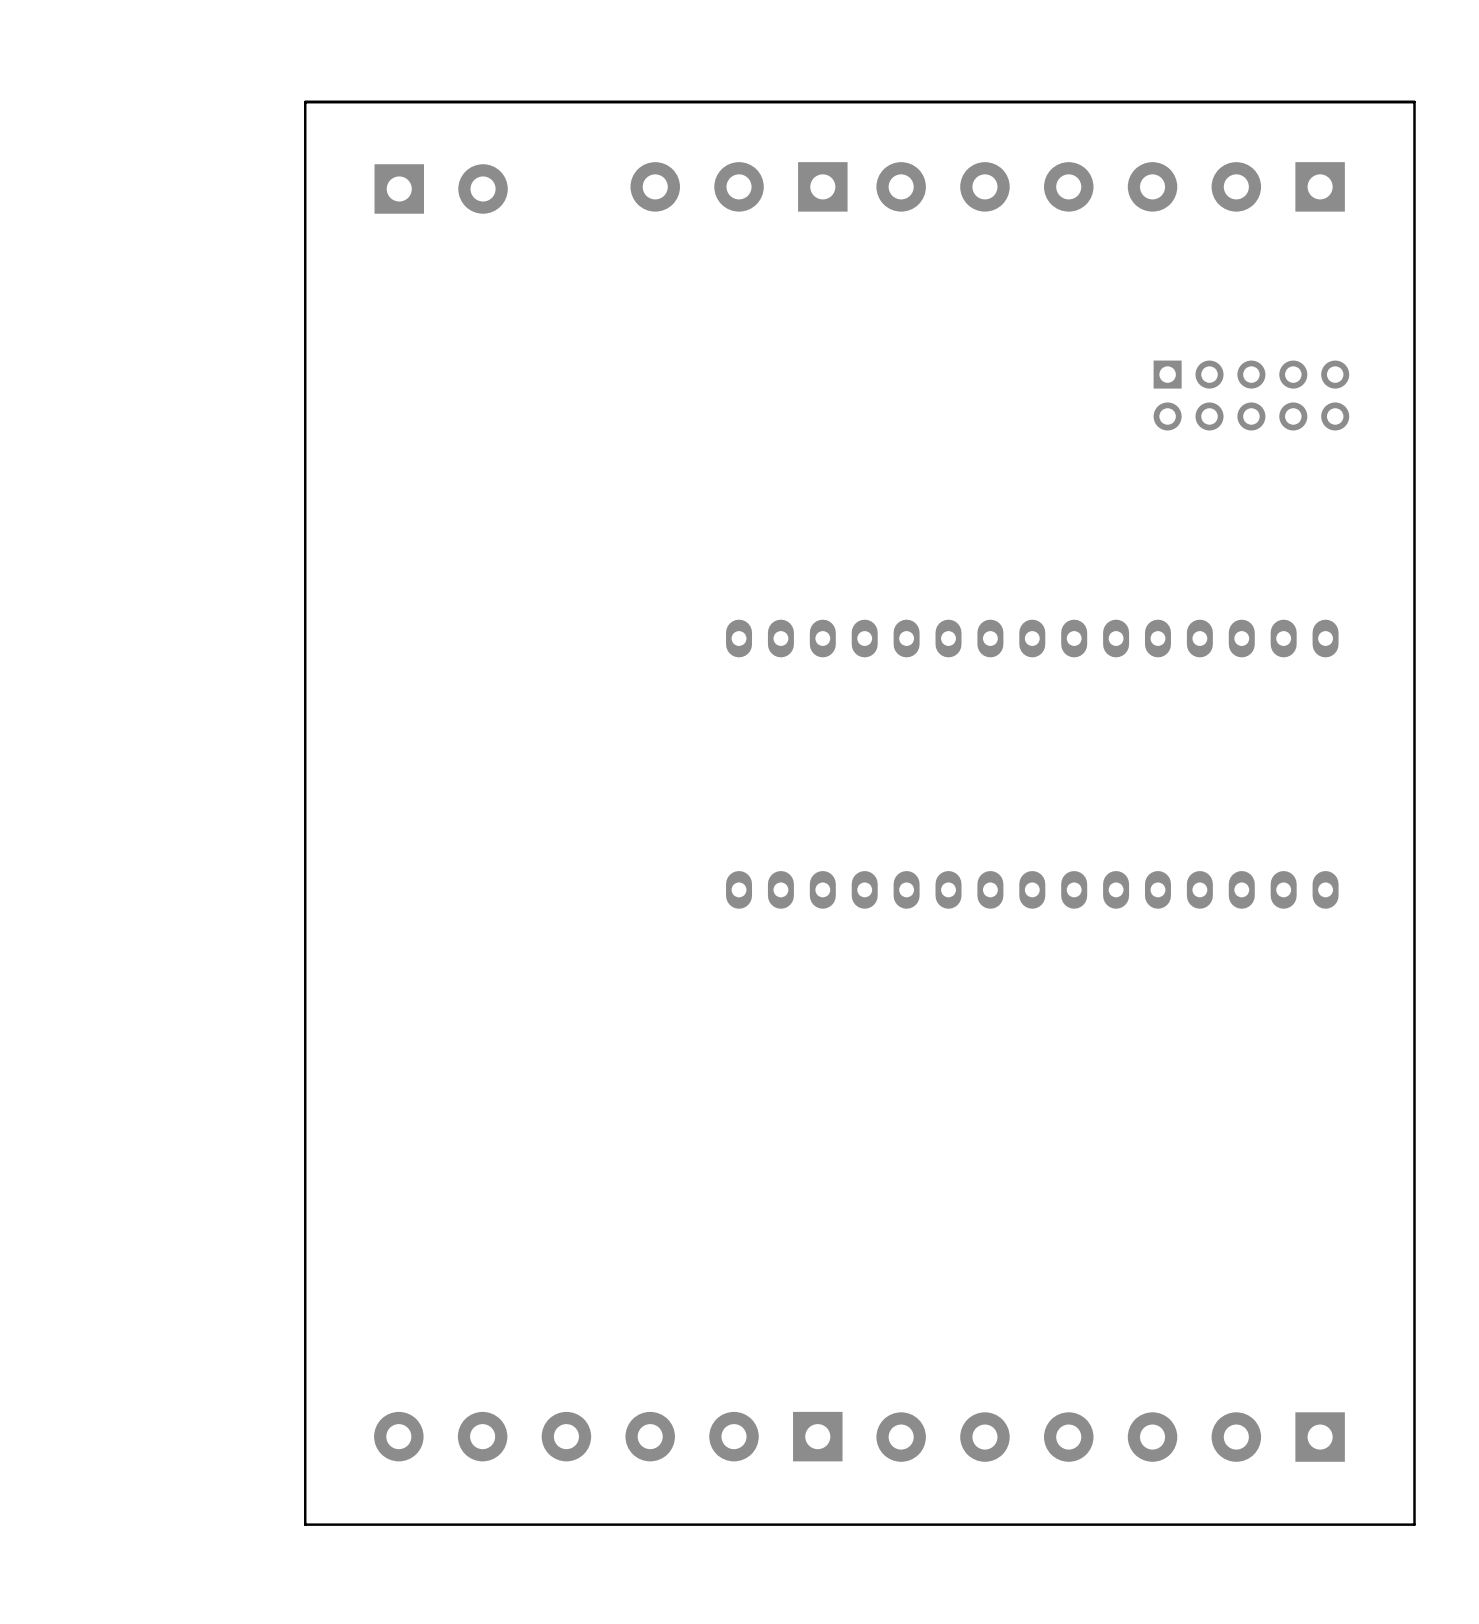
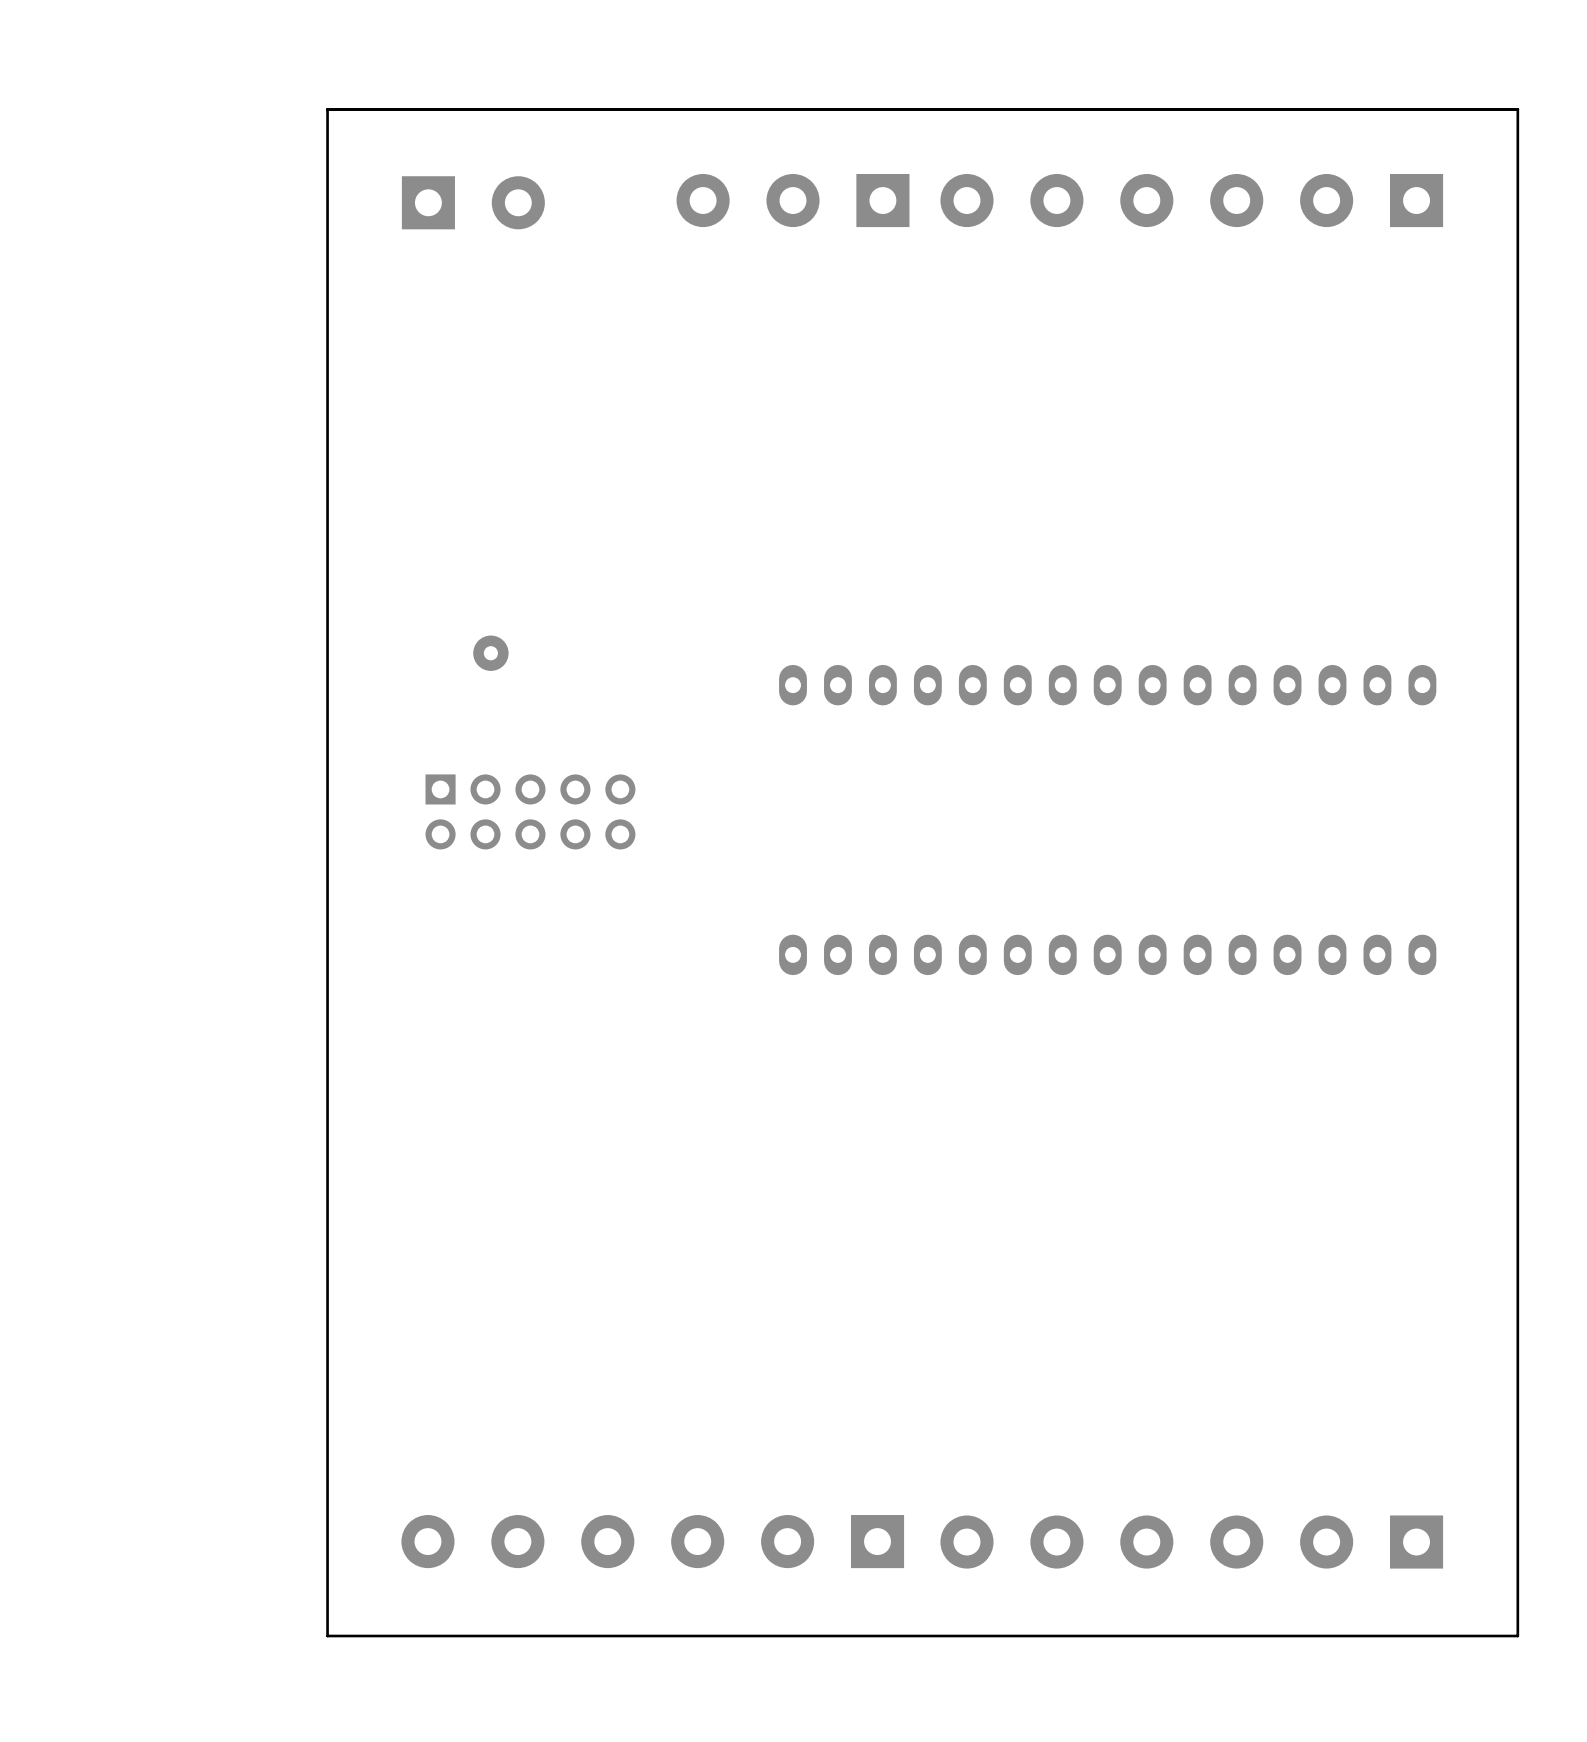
part: (1251, 395) -> none
part: none -> (490, 653)
part: none -> (530, 811)

